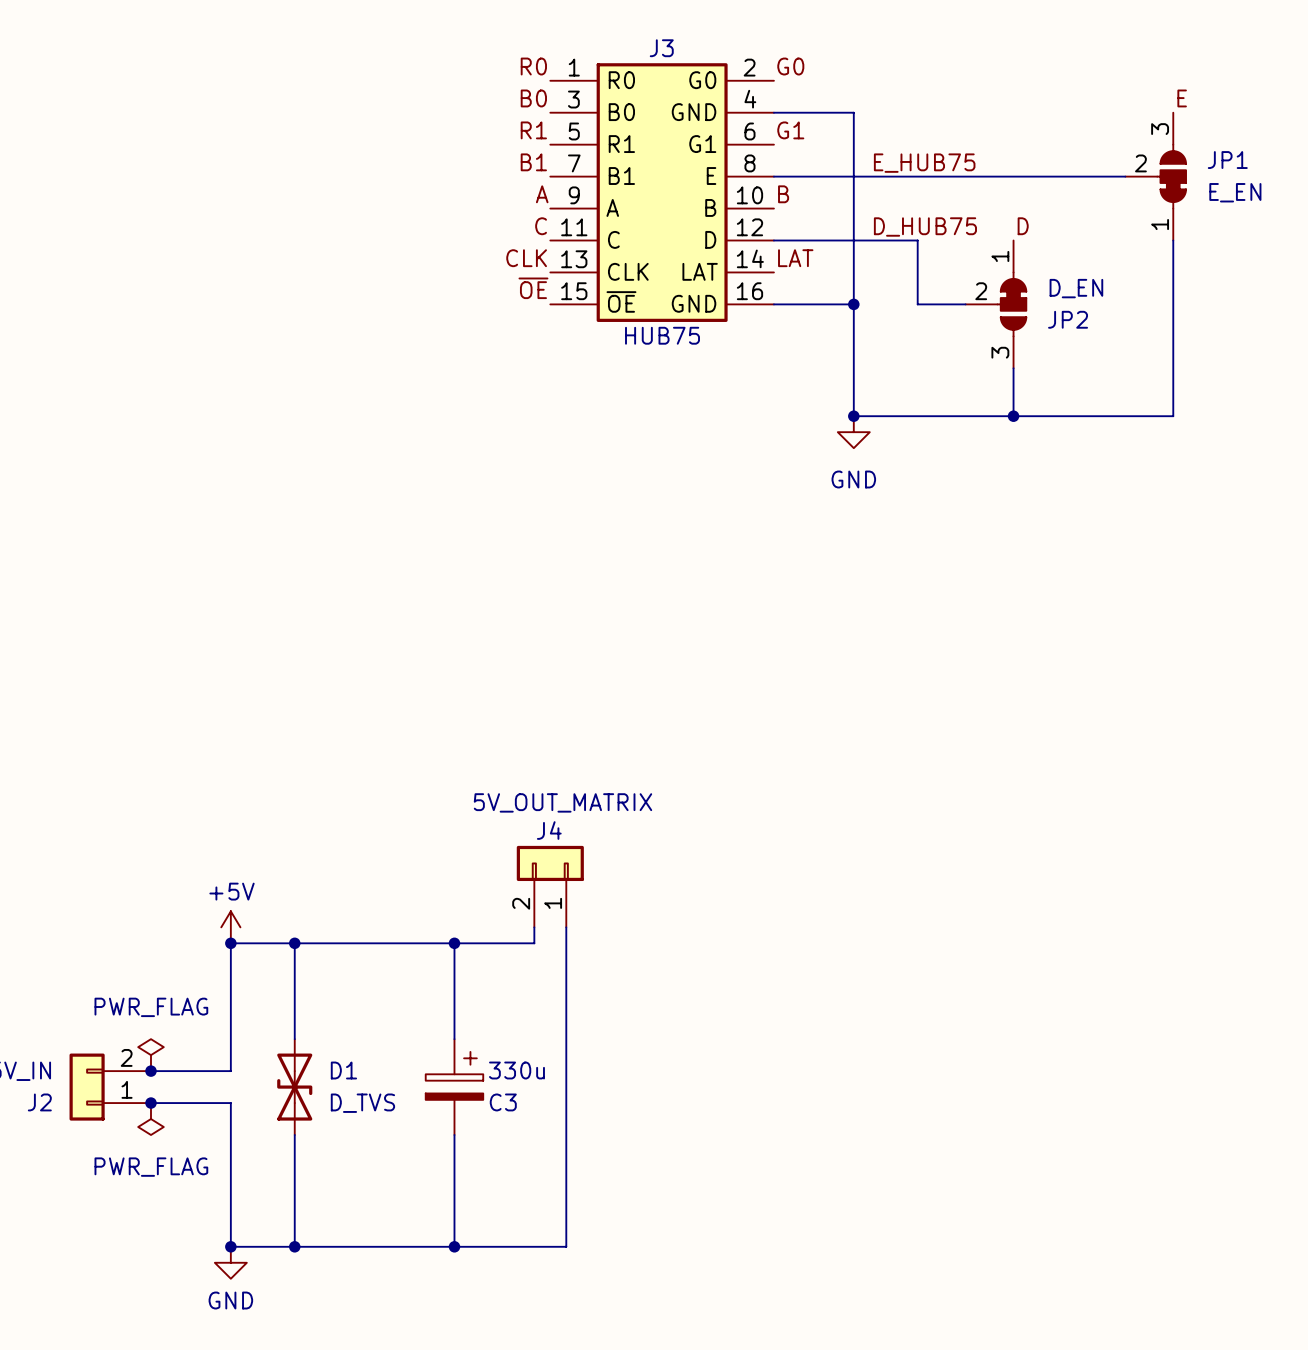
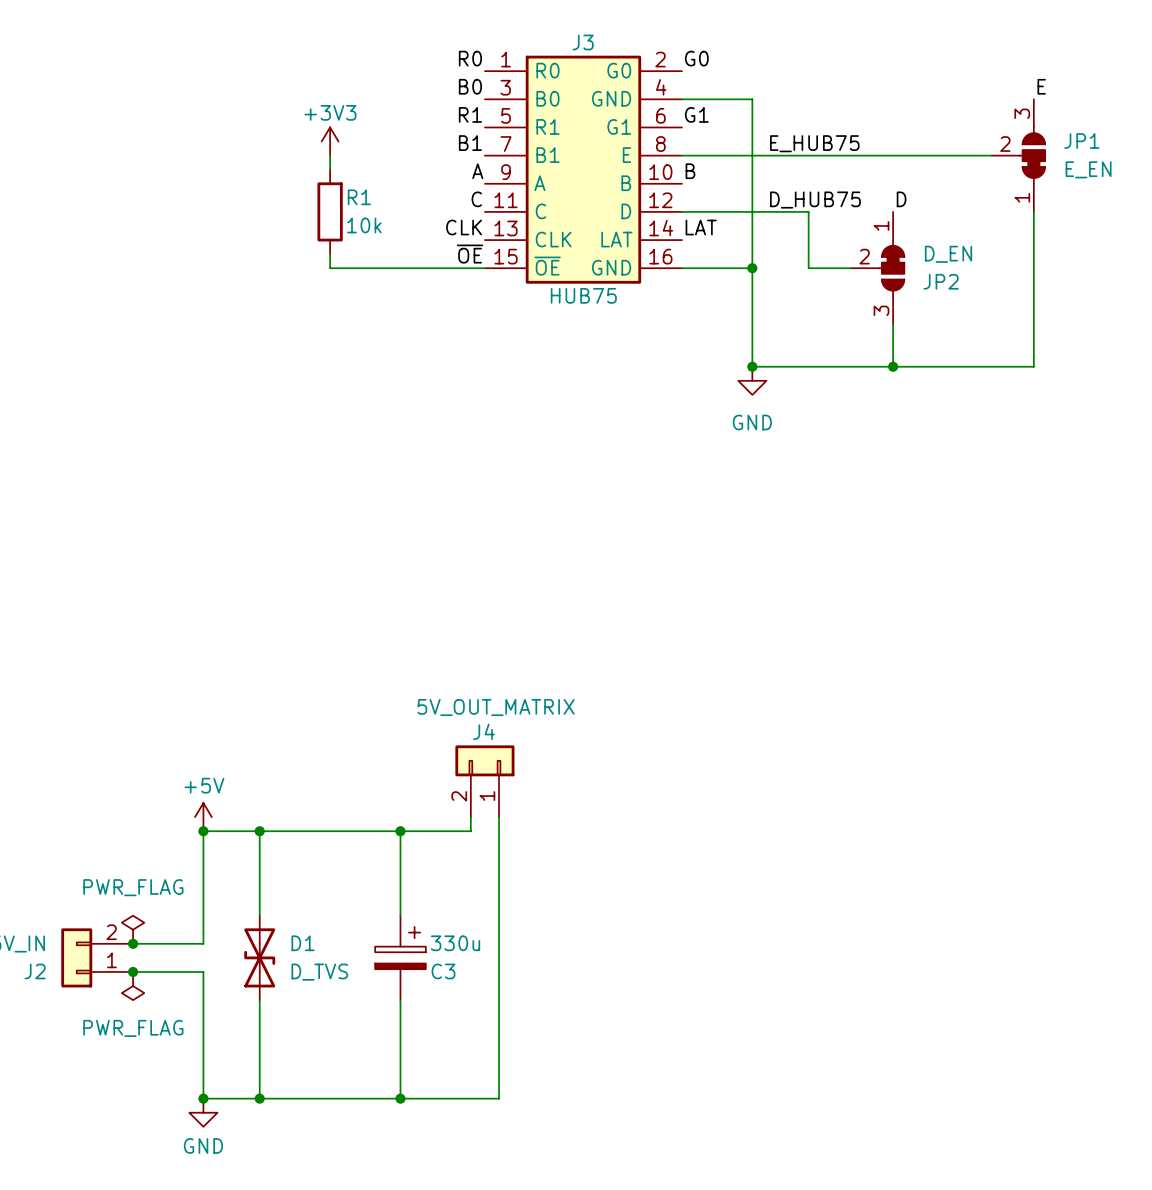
power symbol: none -> +3V3 (330, 141)
wire: none -> (330, 155) (330, 169)
R1: none -> 10k (330, 211)
wire: none -> (330, 254) (330, 268) (484, 268)

